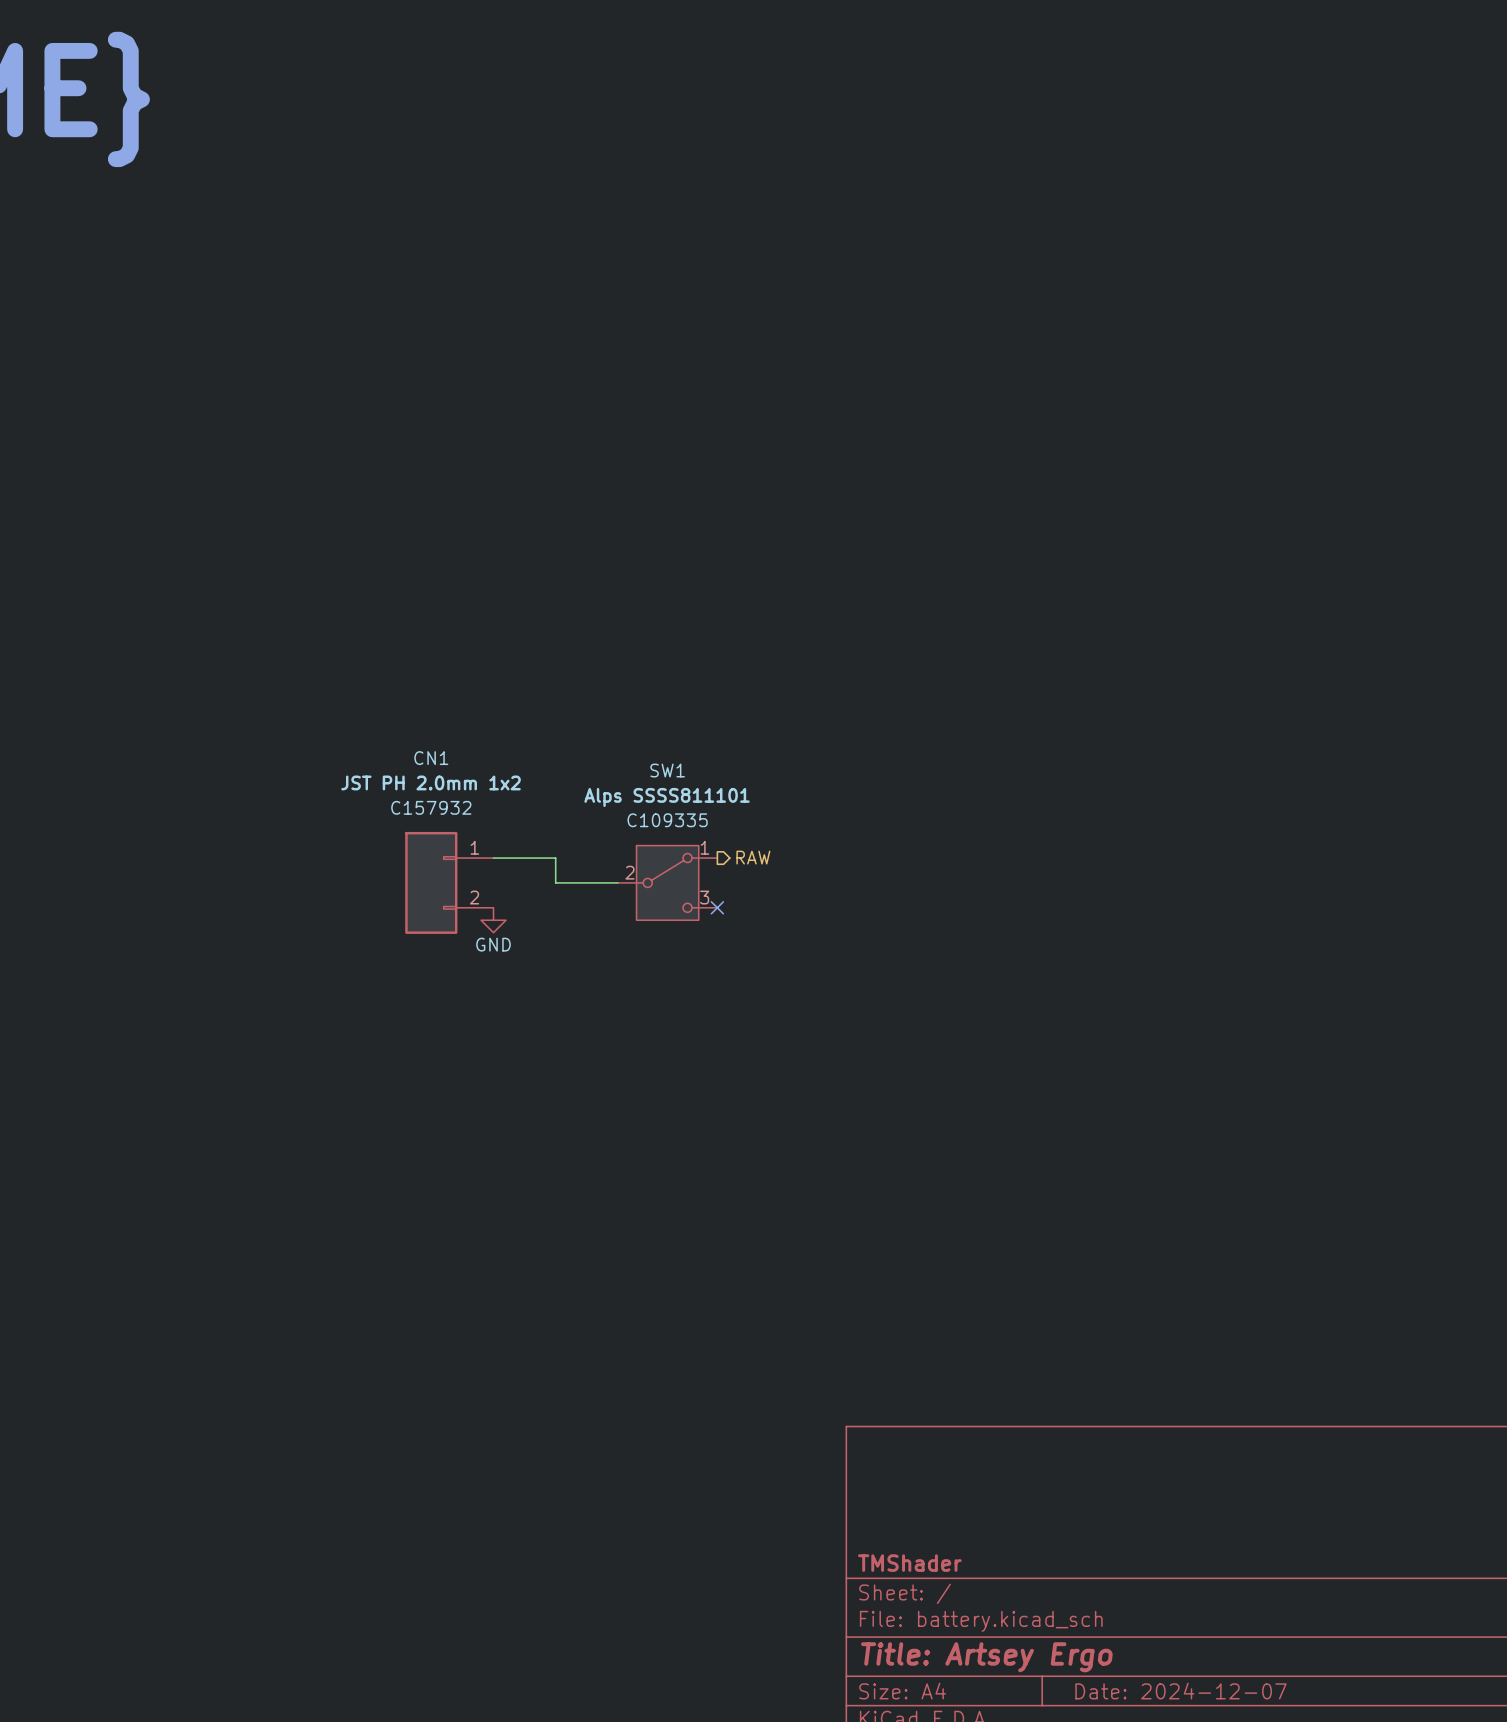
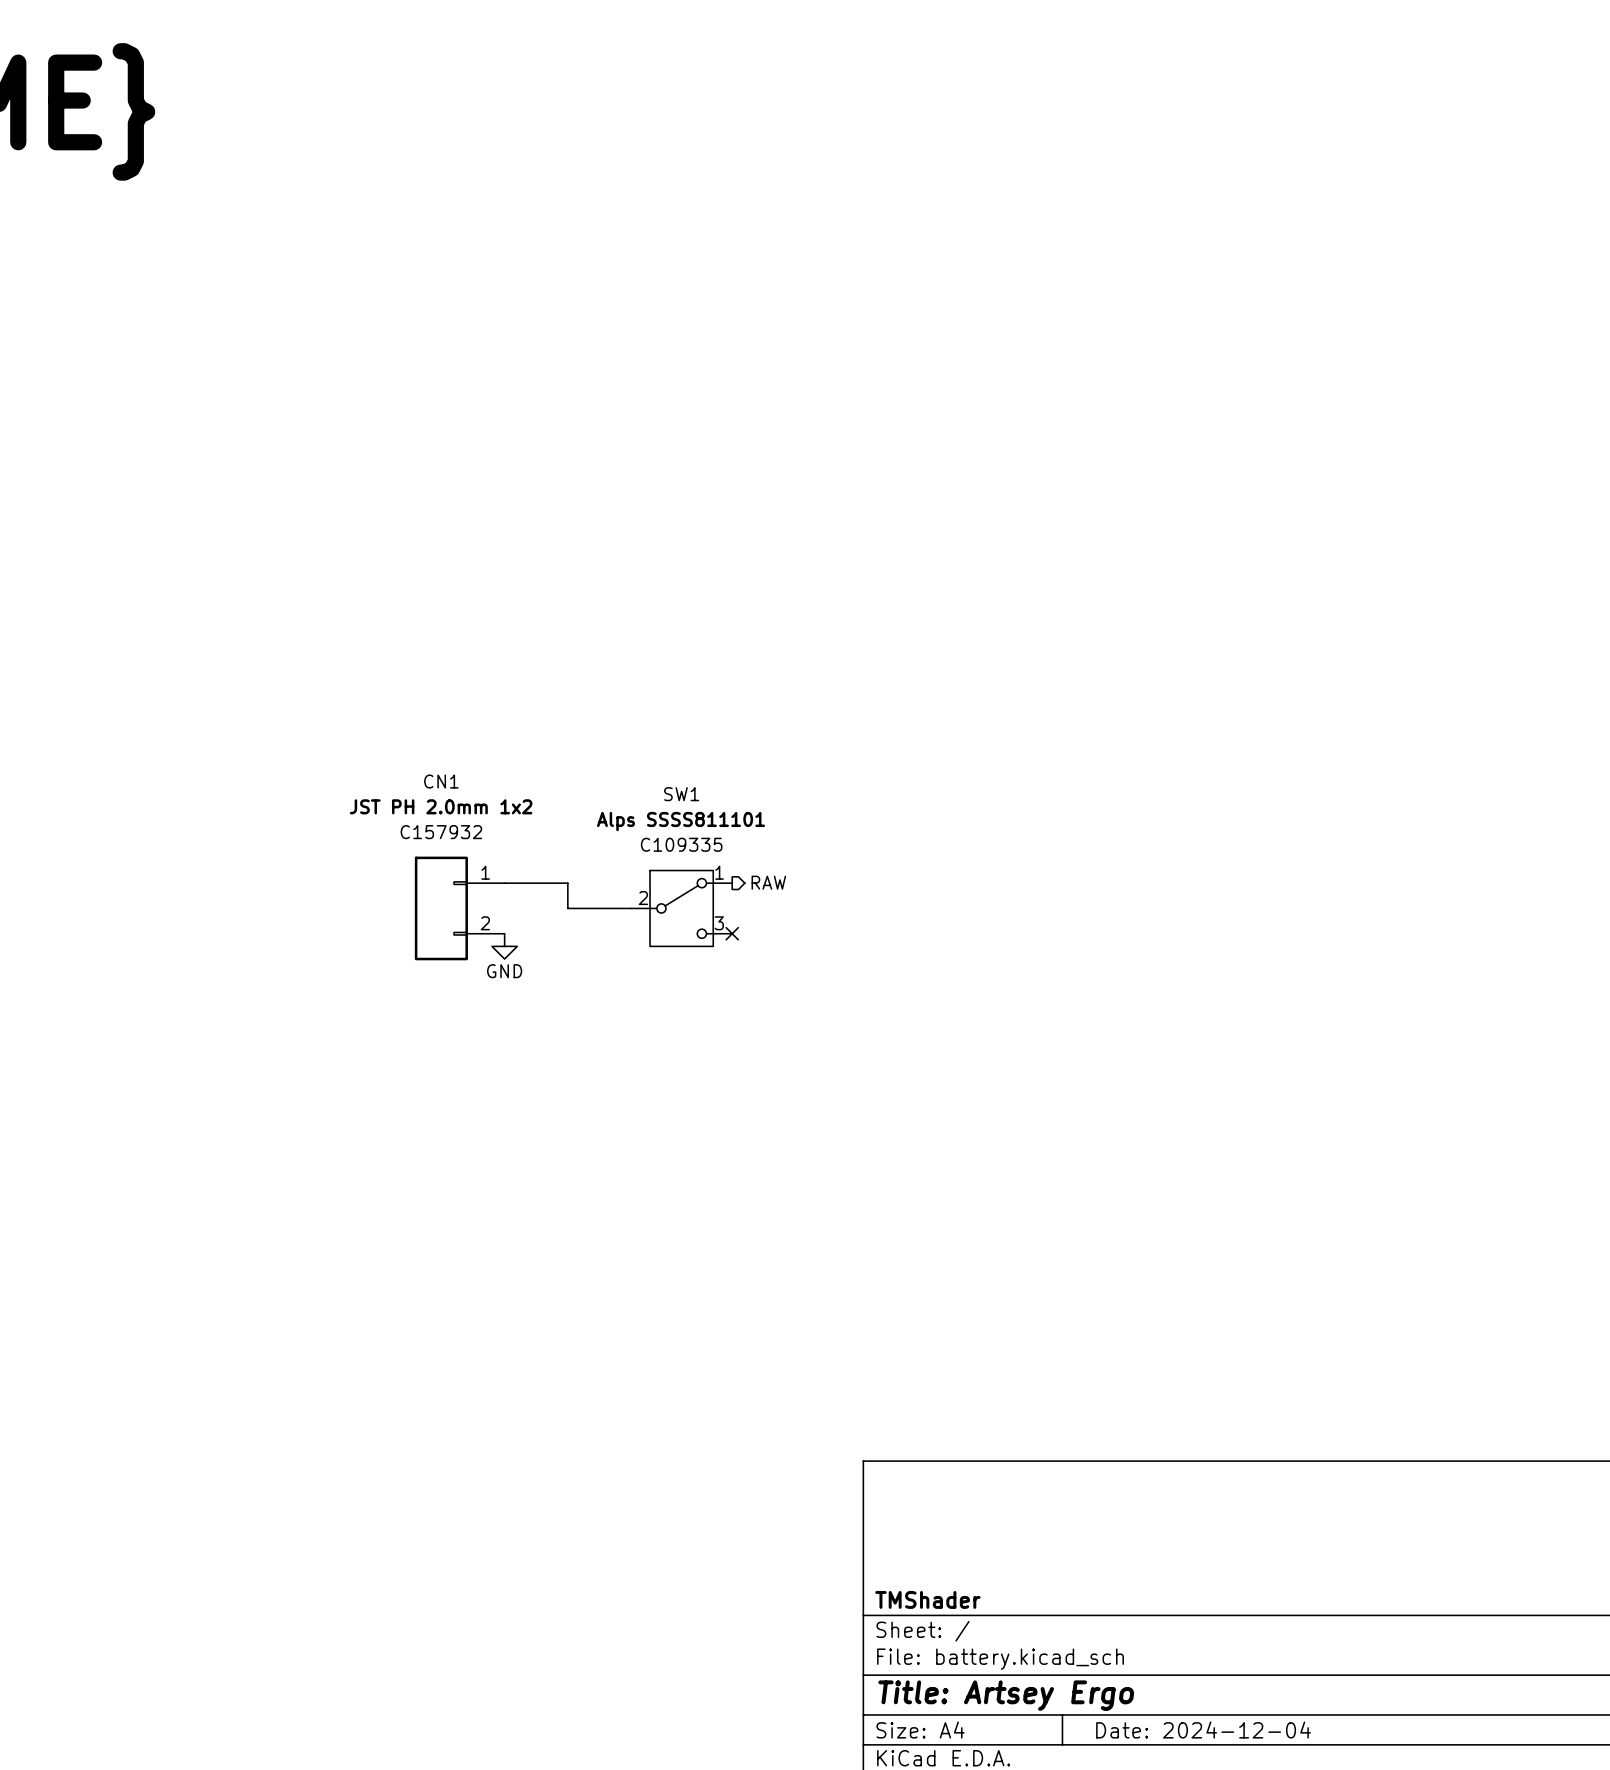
title block: Date: 2024-12-07 (1180, 1691) -> Date: 2024-12-04 (1203, 1729)

